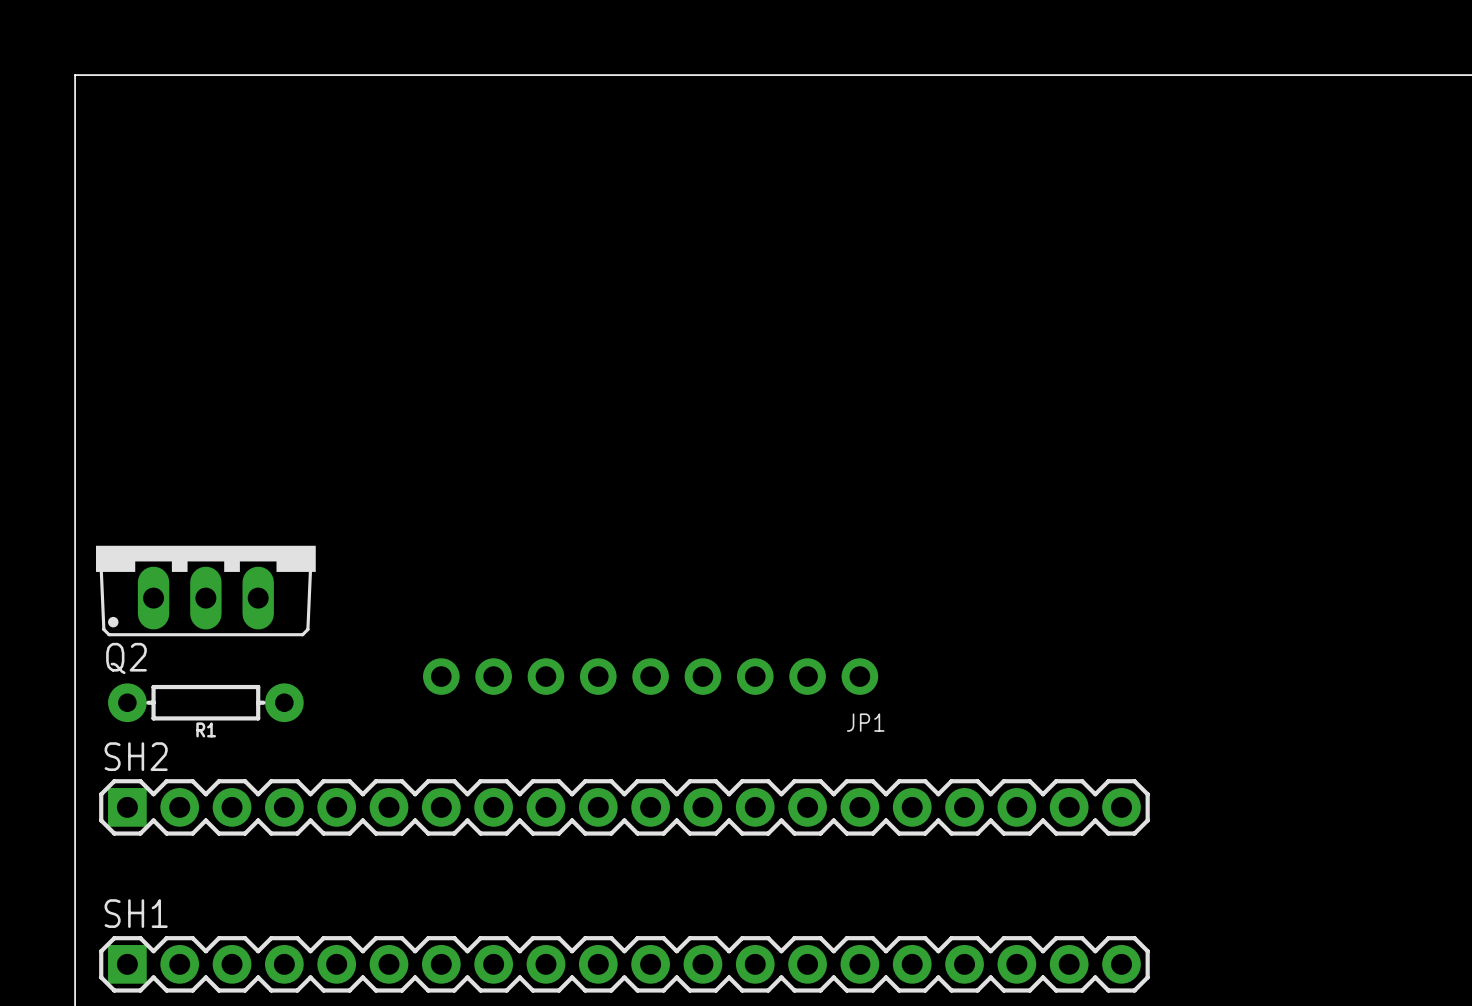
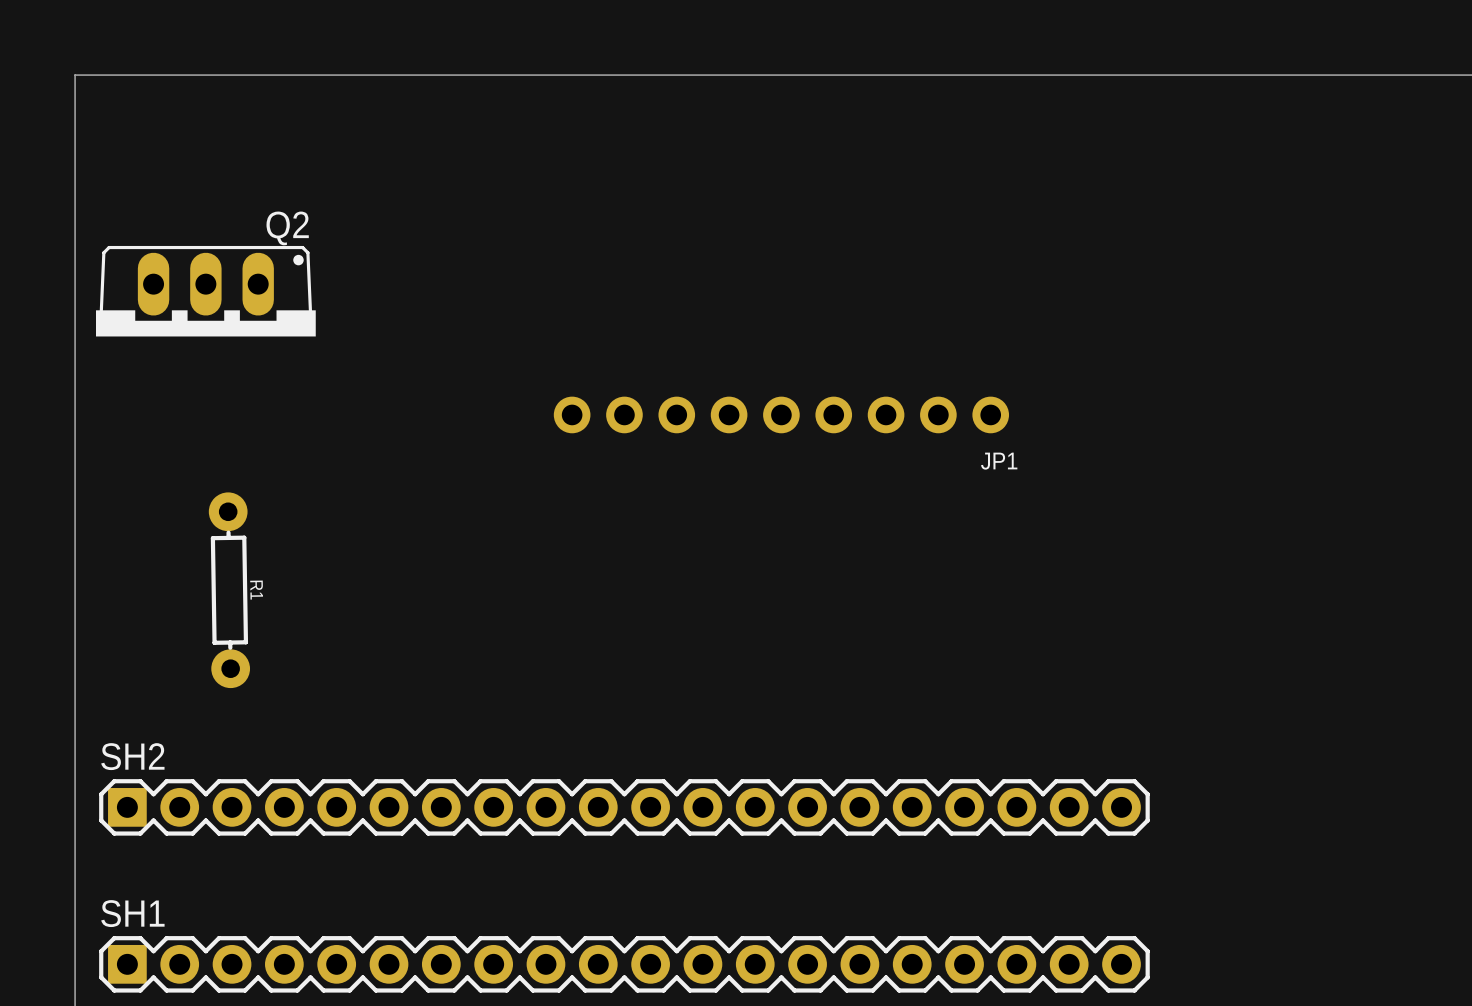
Q2 rotation: 0° (205, 591) -> 180° (205, 291)
Q2 position: (205, 591) -> (205, 291)
JP1 position: (650, 676) -> (781, 414)
R1 rotation: 0° (205, 702) -> 89.1° clockwise (229, 590)

